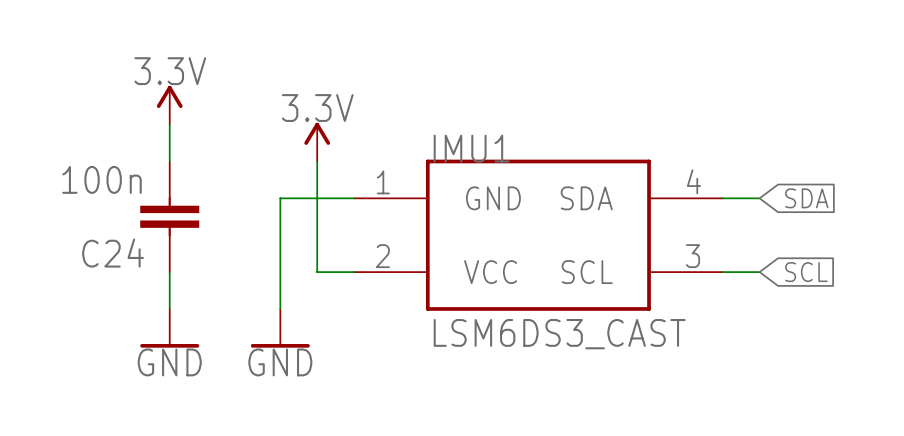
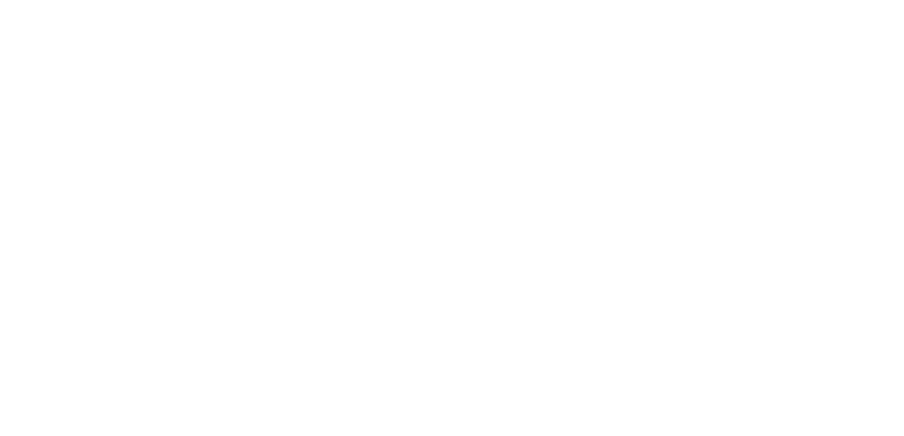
power symbol: 3.3V (169, 105) -> none
wire: (169, 124) (169, 161) -> none
power symbol: 3.3V (317, 142) -> none
wire: (317, 161) (317, 272) (354, 272) -> none
wire: (354, 198) (280, 198) (280, 308) -> none
wire: (722, 198) (759, 198) -> none
global label: SDA (806, 198) -> none
C24: 100n (169, 216) -> none
IMU1: LSM6DS3_CAST (538, 235) -> none
wire: (169, 272) (169, 308) -> none
wire: (722, 272) (759, 272) -> none
global label: SCL (806, 272) -> none
power symbol: GND (169, 328) -> none
power symbol: GND (280, 328) -> none

